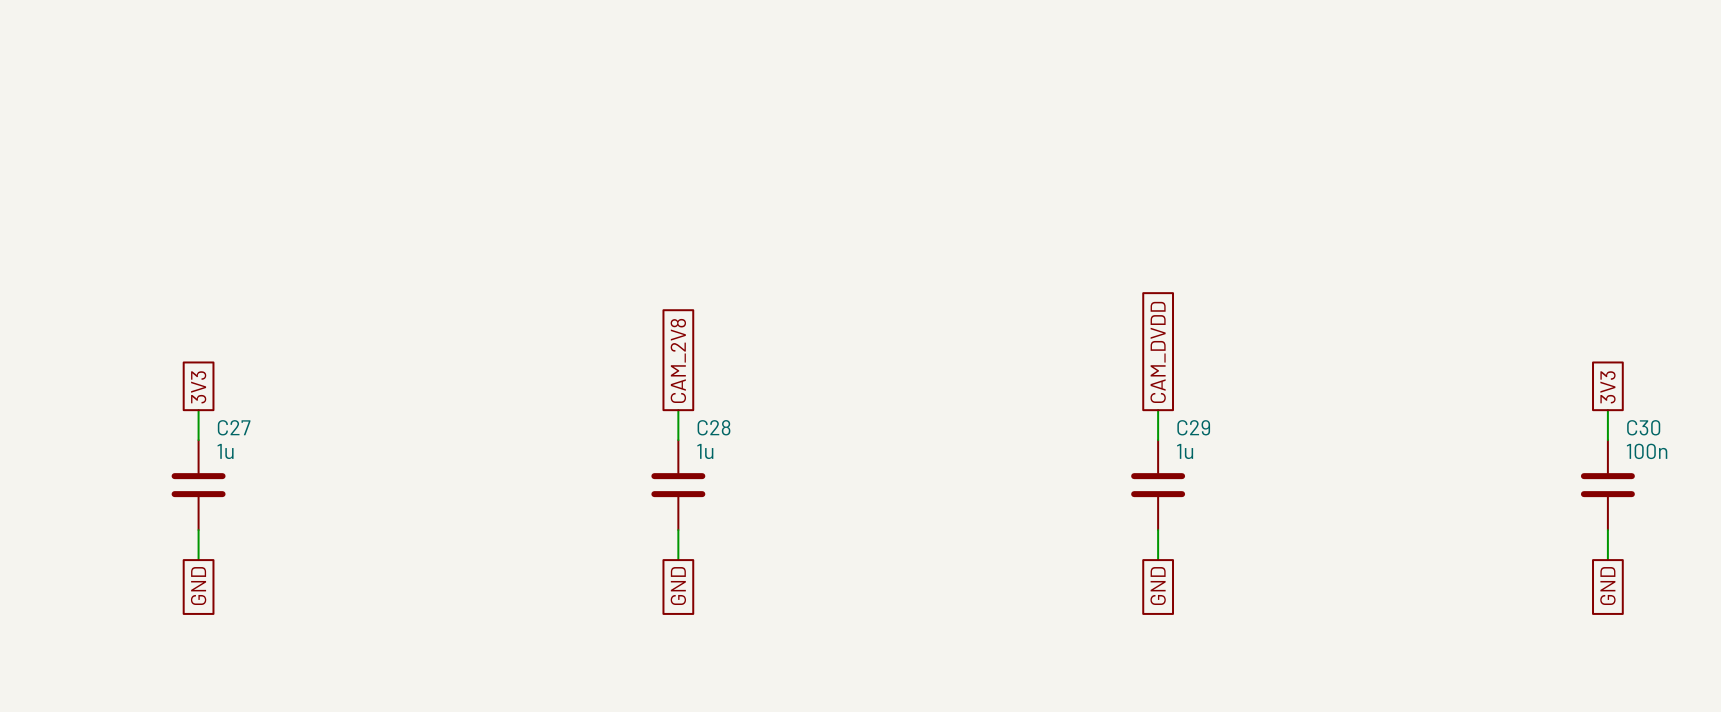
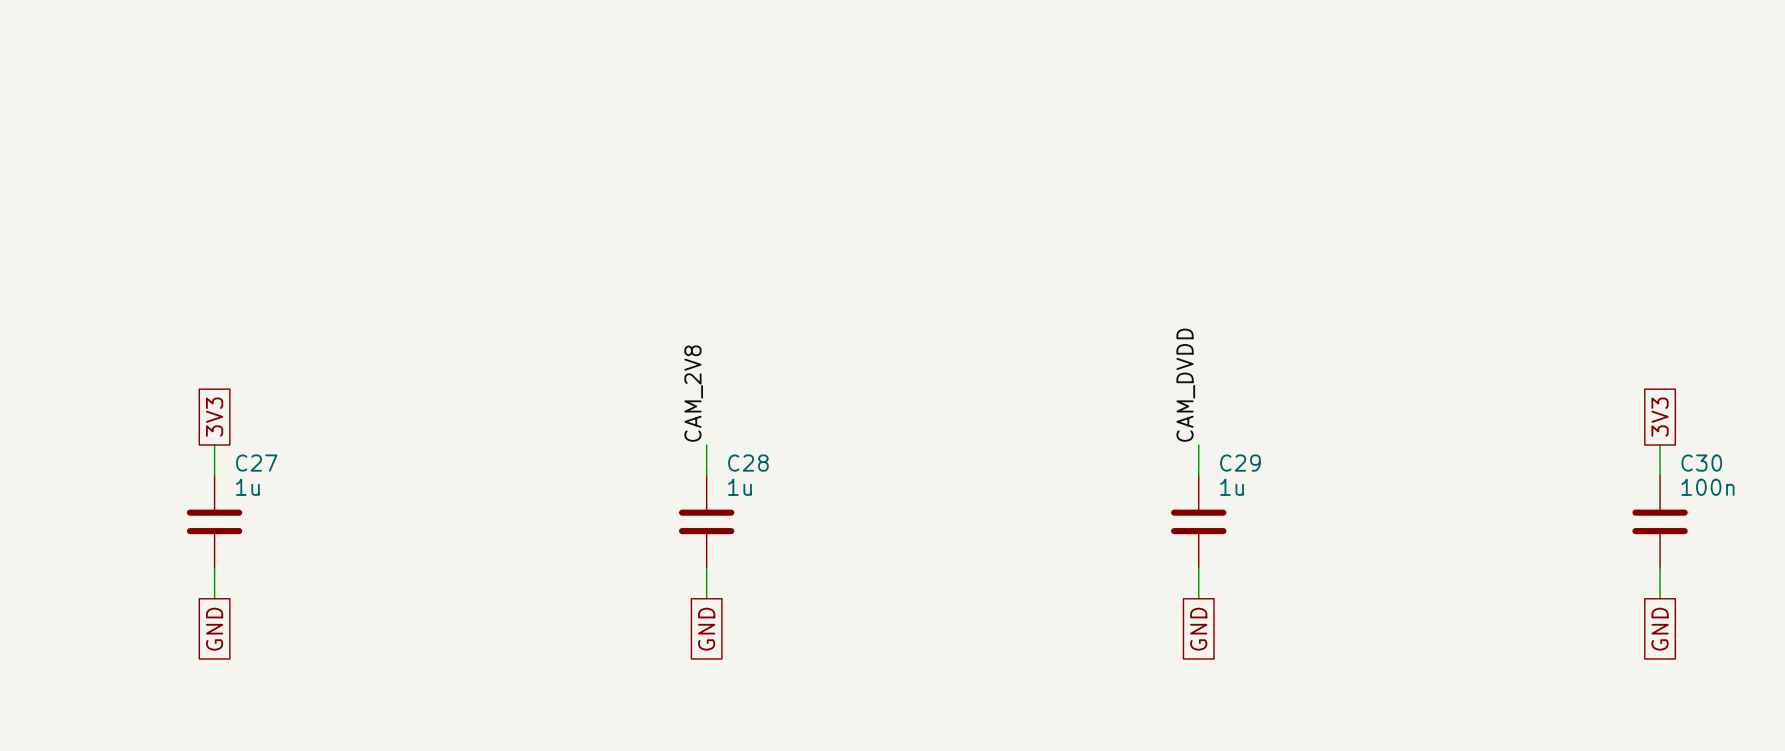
global label: CAM_DVDD (1158, 352) -> none
label: none -> CAM_DVDD (1185, 385)
global label: CAM_2V8 (678, 360) -> none
label: none -> CAM_2V8 (693, 393)

